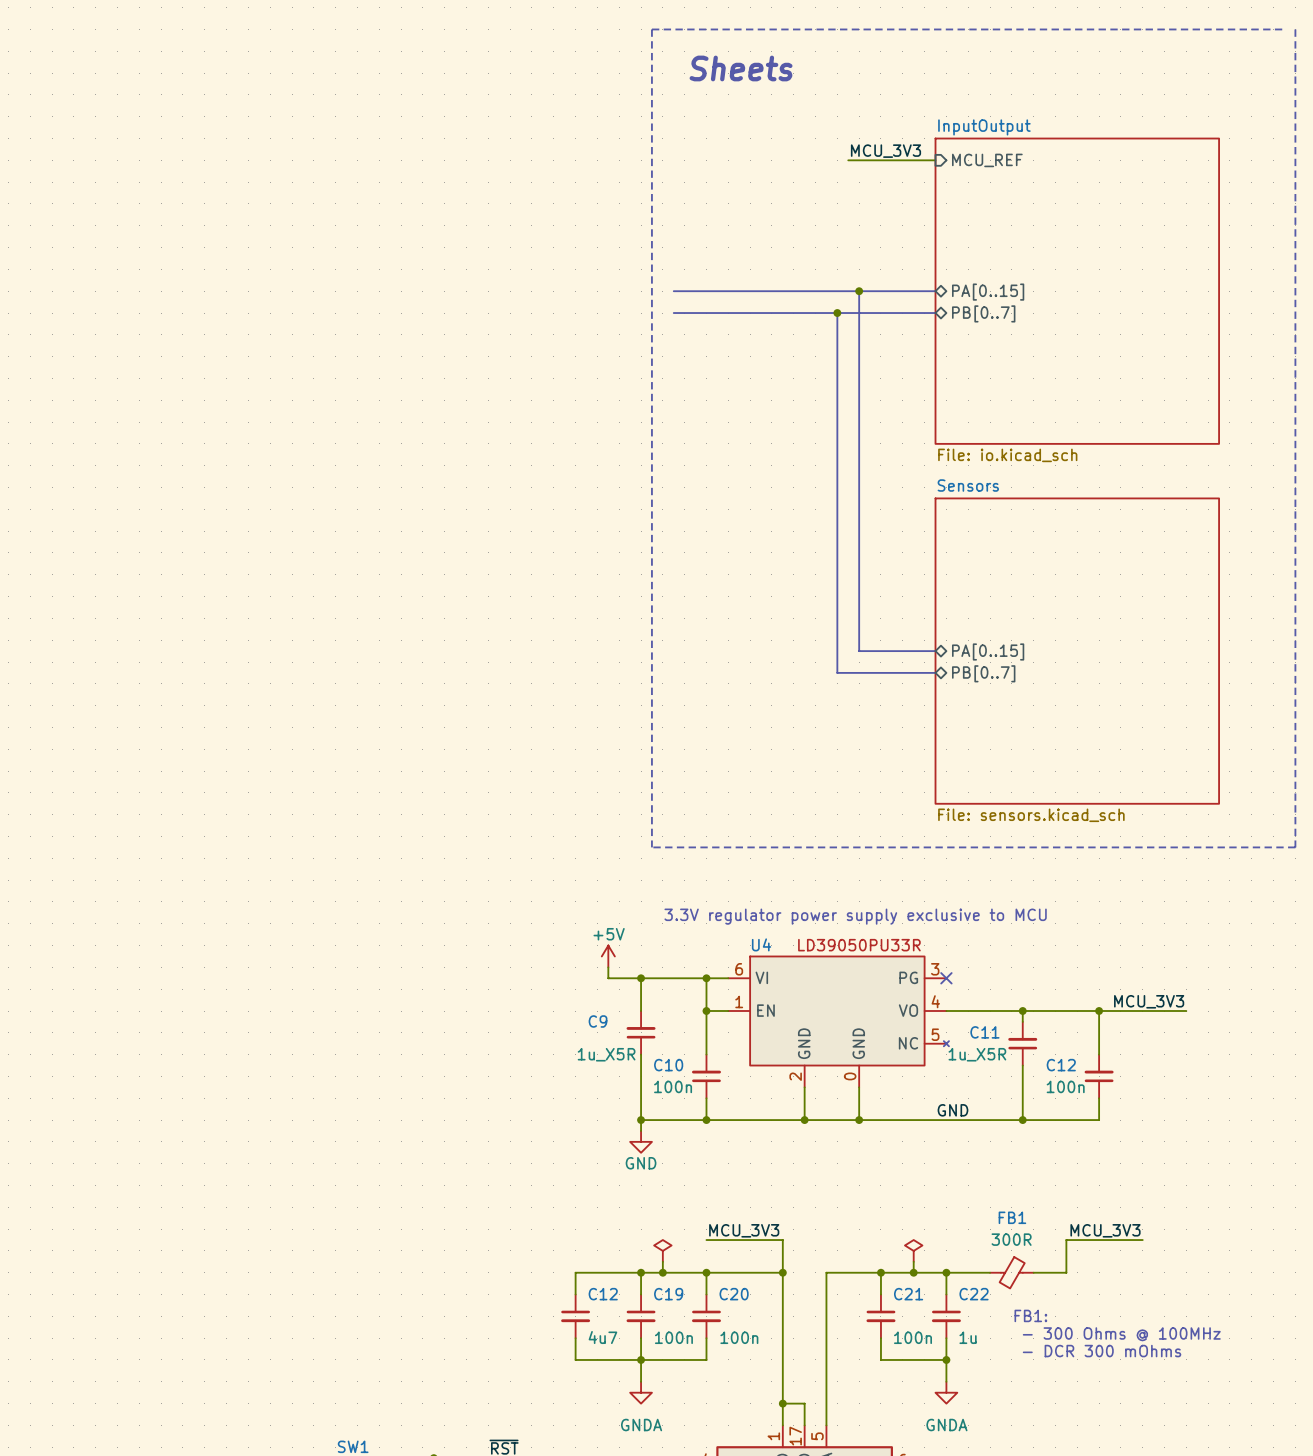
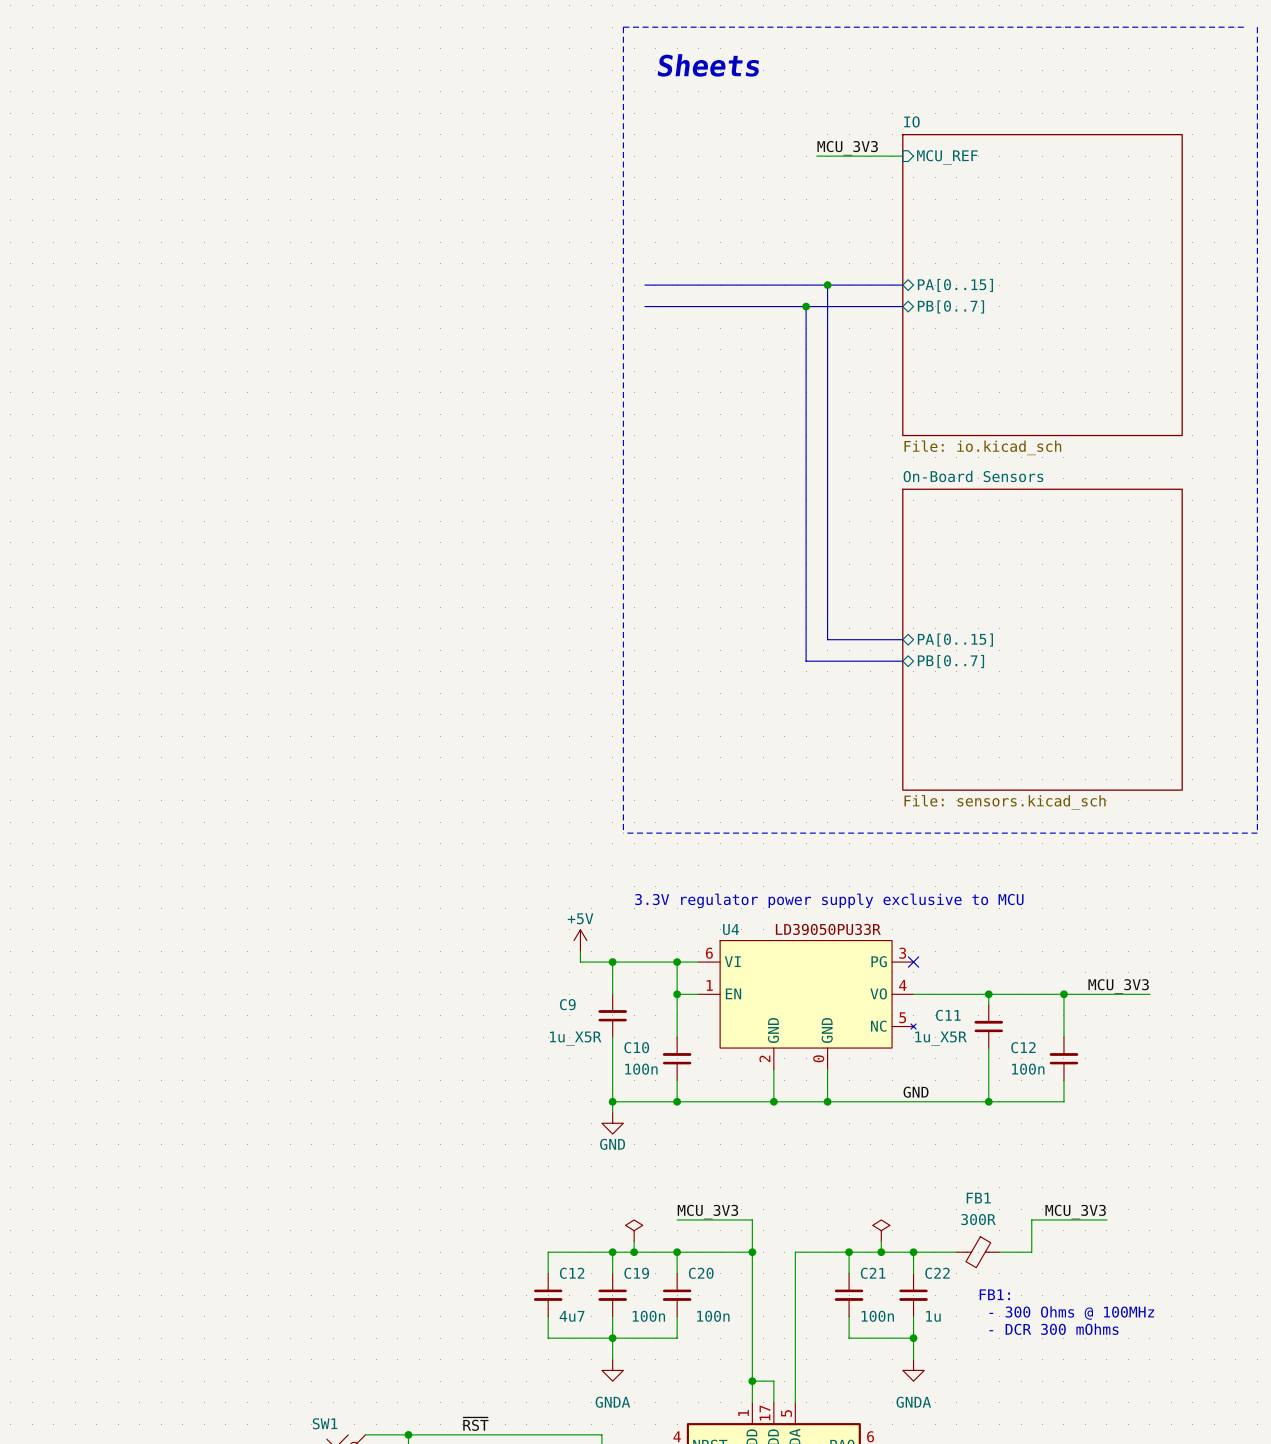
sheet InputOutput name: InputOutput (984, 127) -> IO (911, 121)
sheet Sensors name: Sensors (968, 485) -> On-Board Sensors (973, 476)

